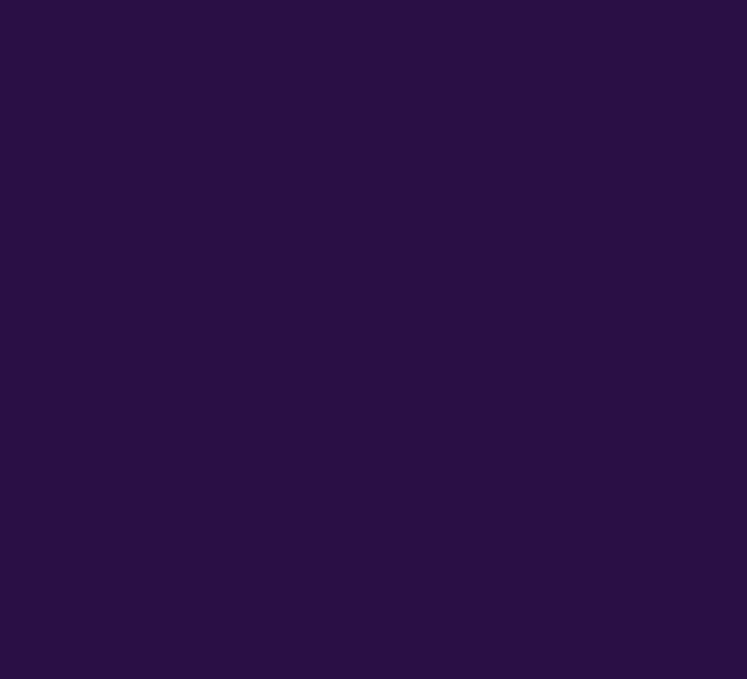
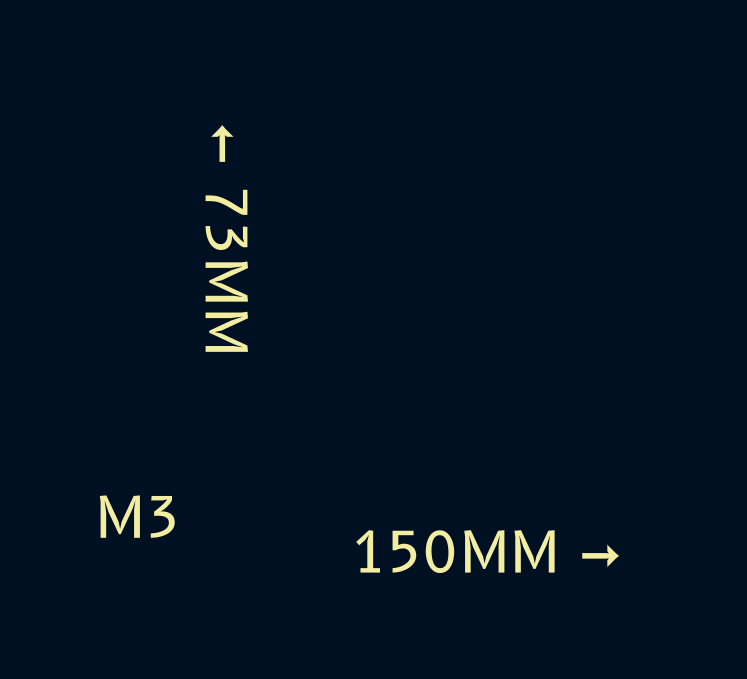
text: none -> ← 73MM (226, 238)
text: none -> M3 (137, 516)
text: none -> 150MM → (487, 551)

